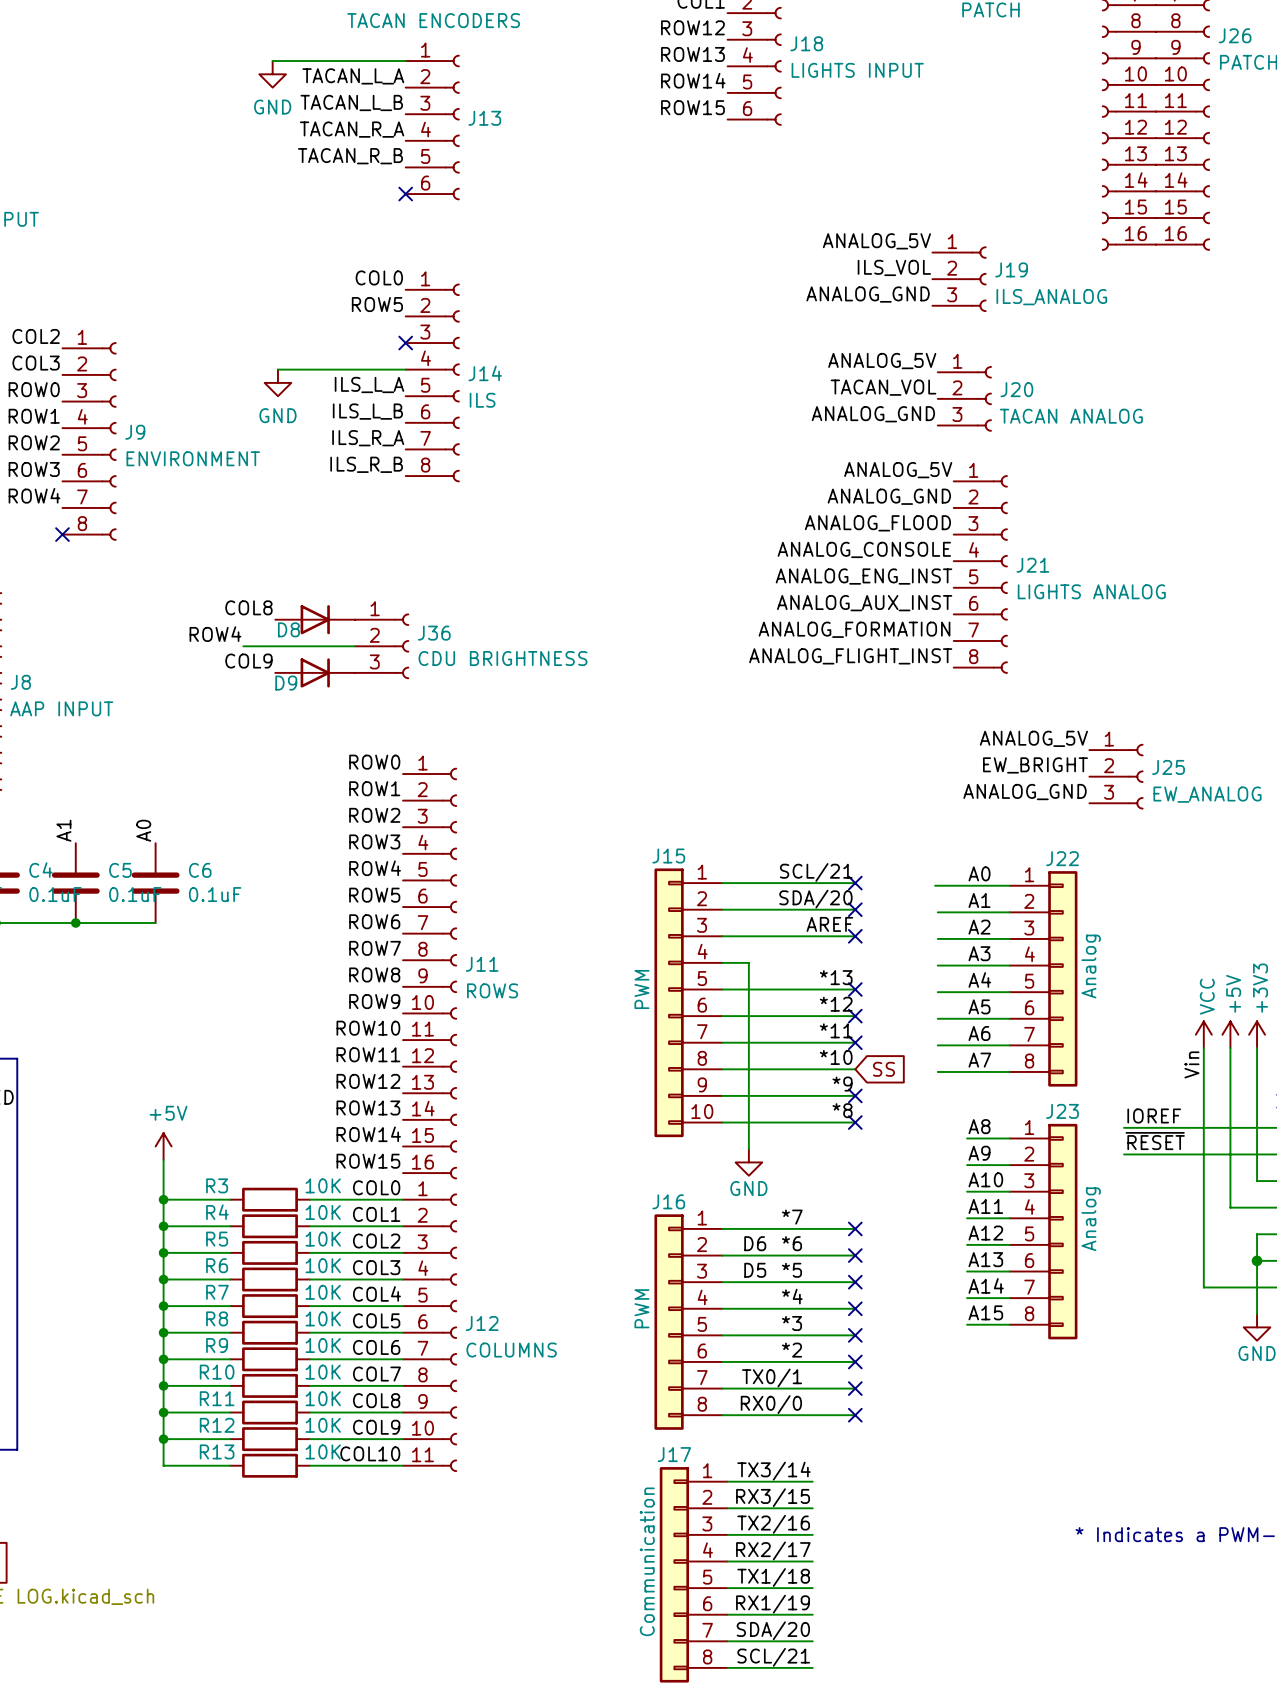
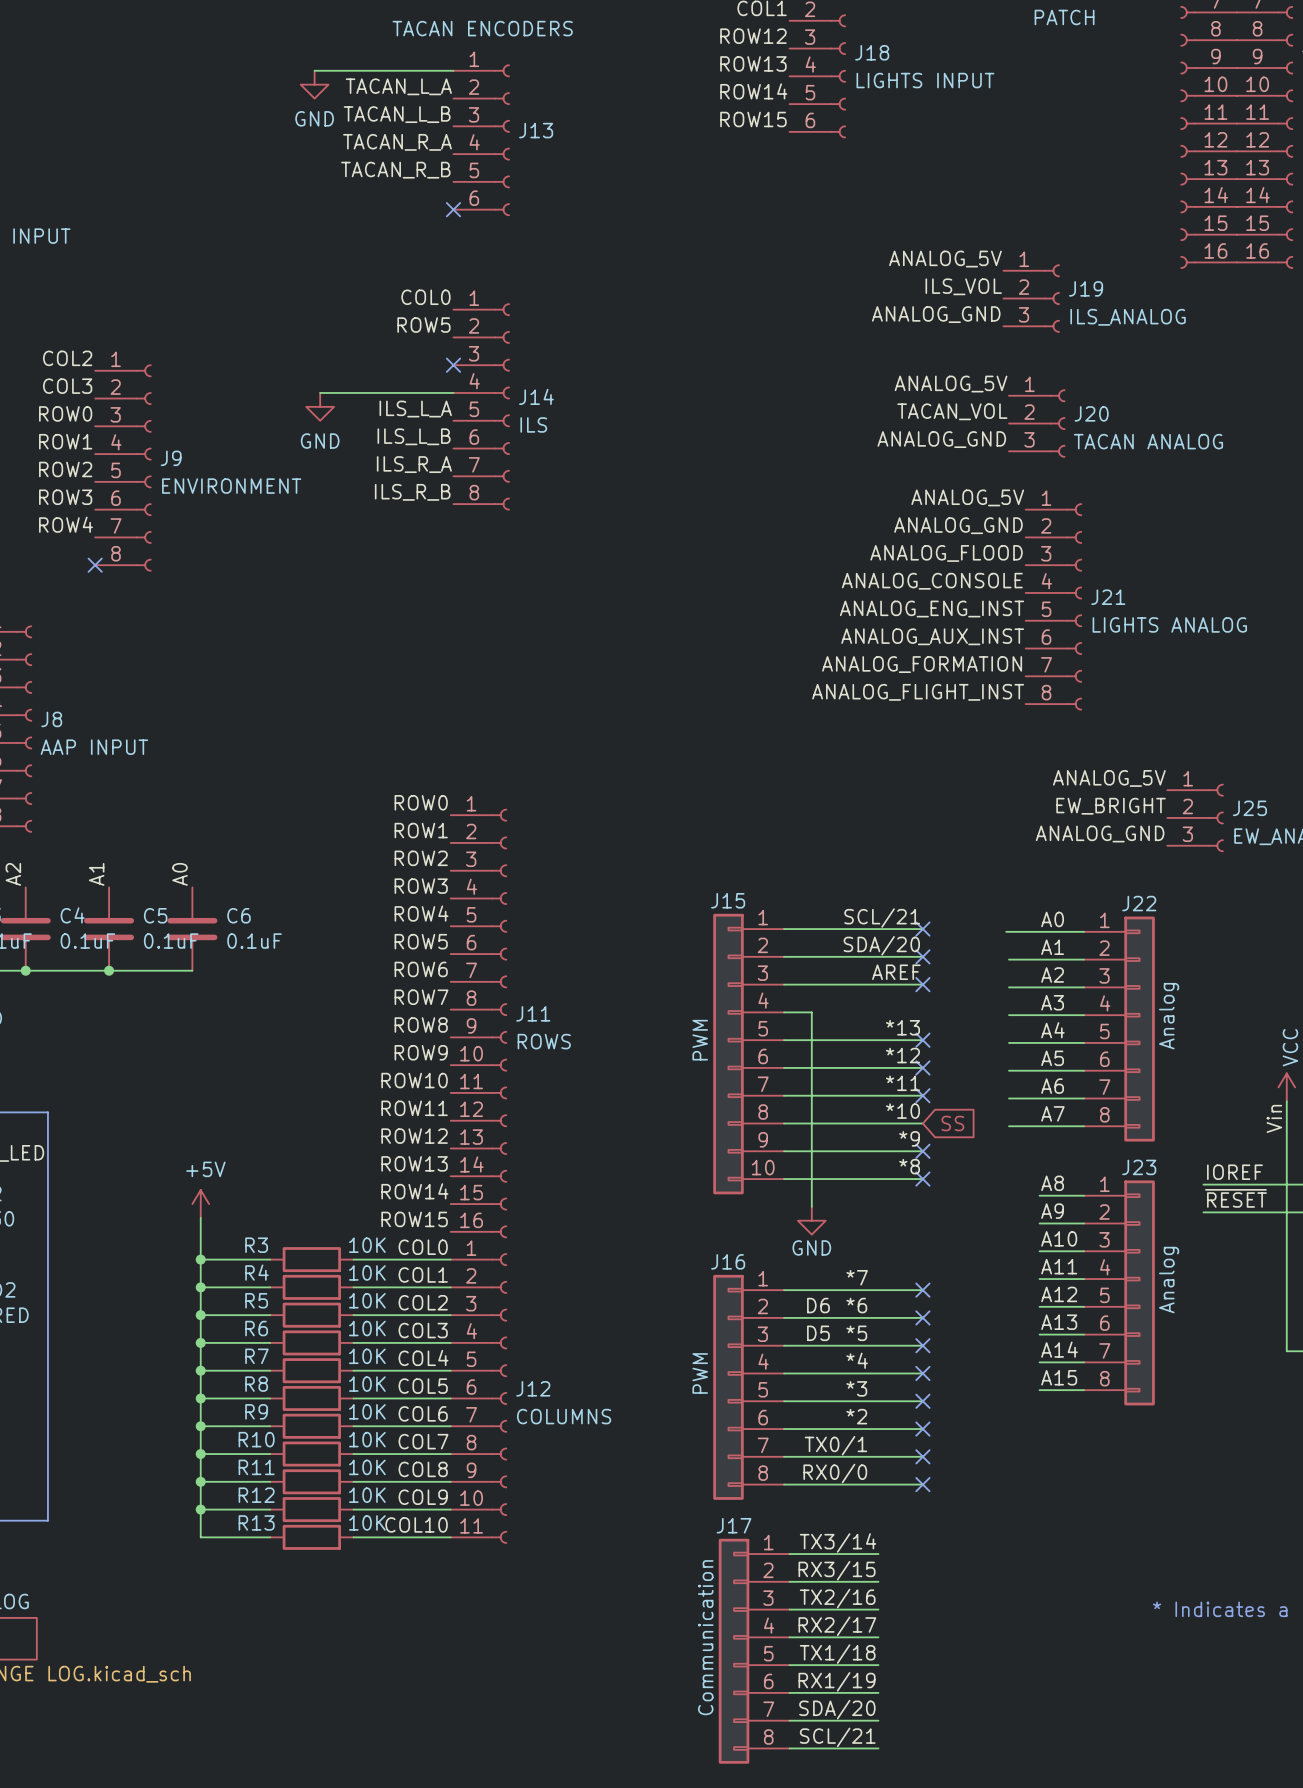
label: COL8 (248, 607) -> none
D8: (315, 619) -> none
label: ROW4 (215, 634) -> none
wire: (243, 646) (355, 646) -> none
J36: CDU BRIGHTNESS (382, 646) -> none
label: COL9 (248, 661) -> none
D9: (315, 672) -> none

